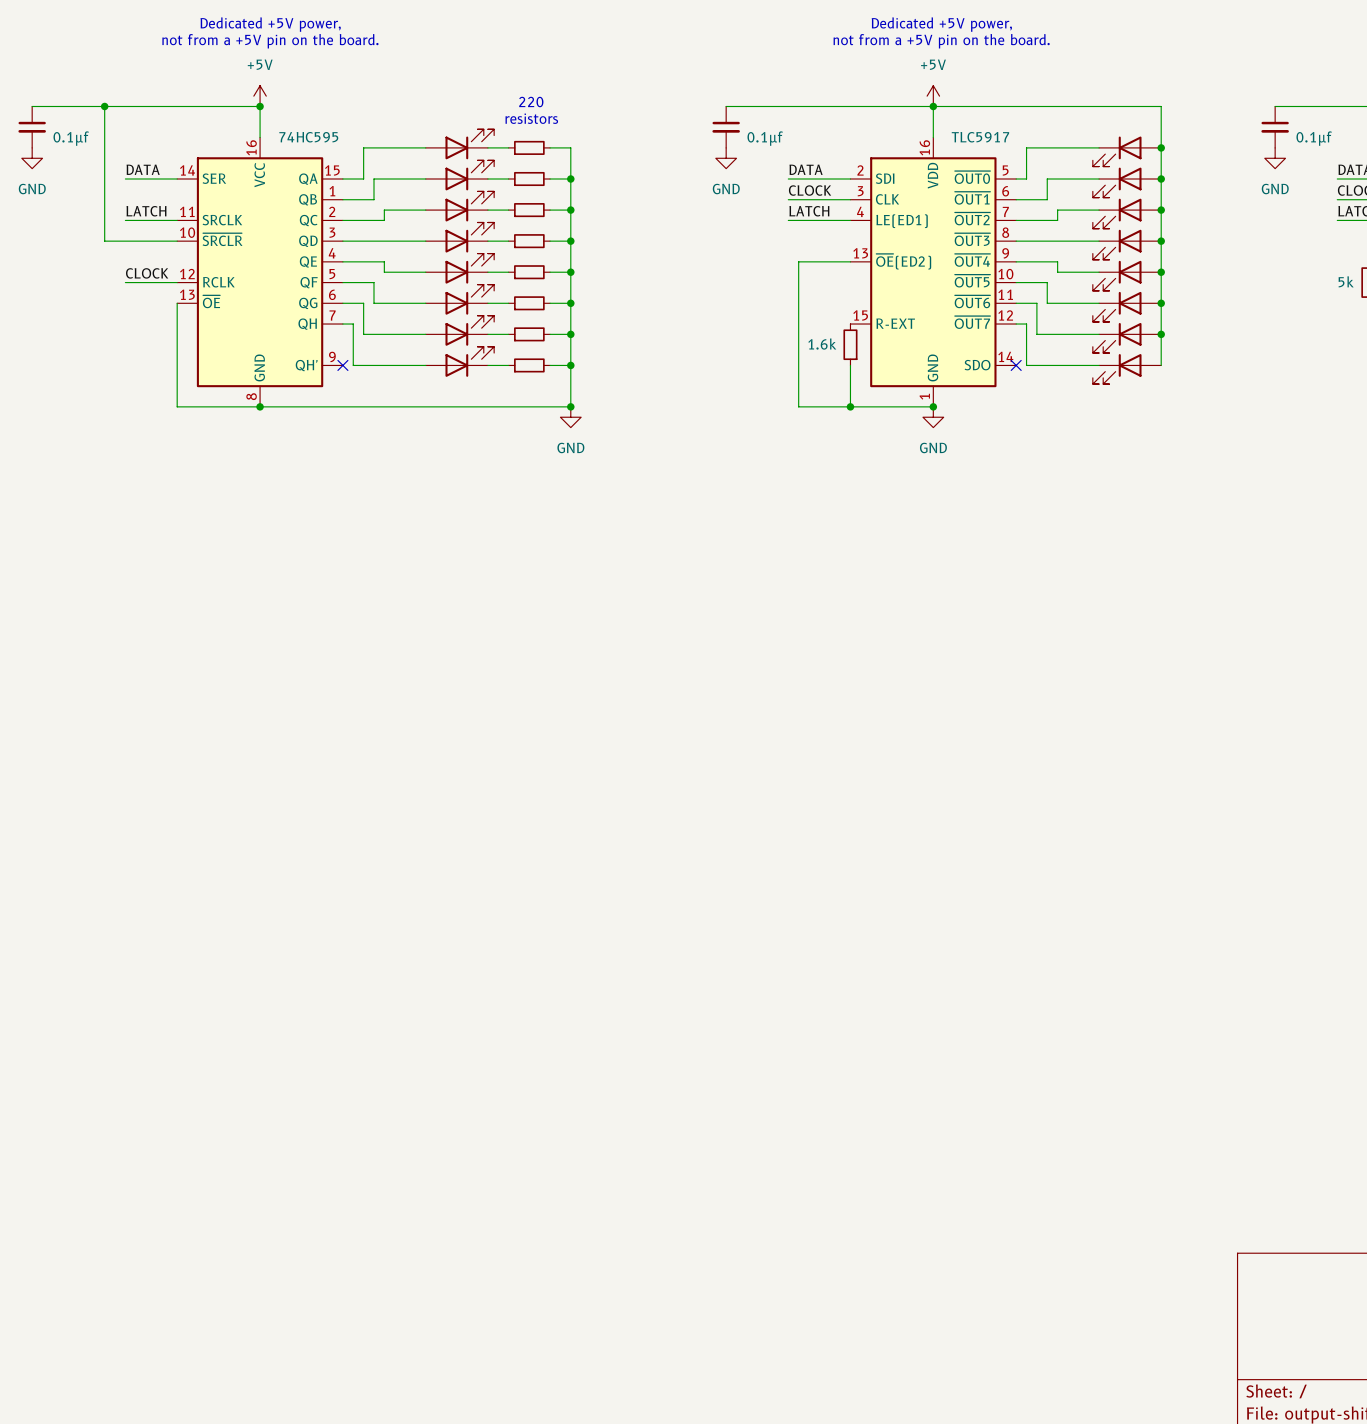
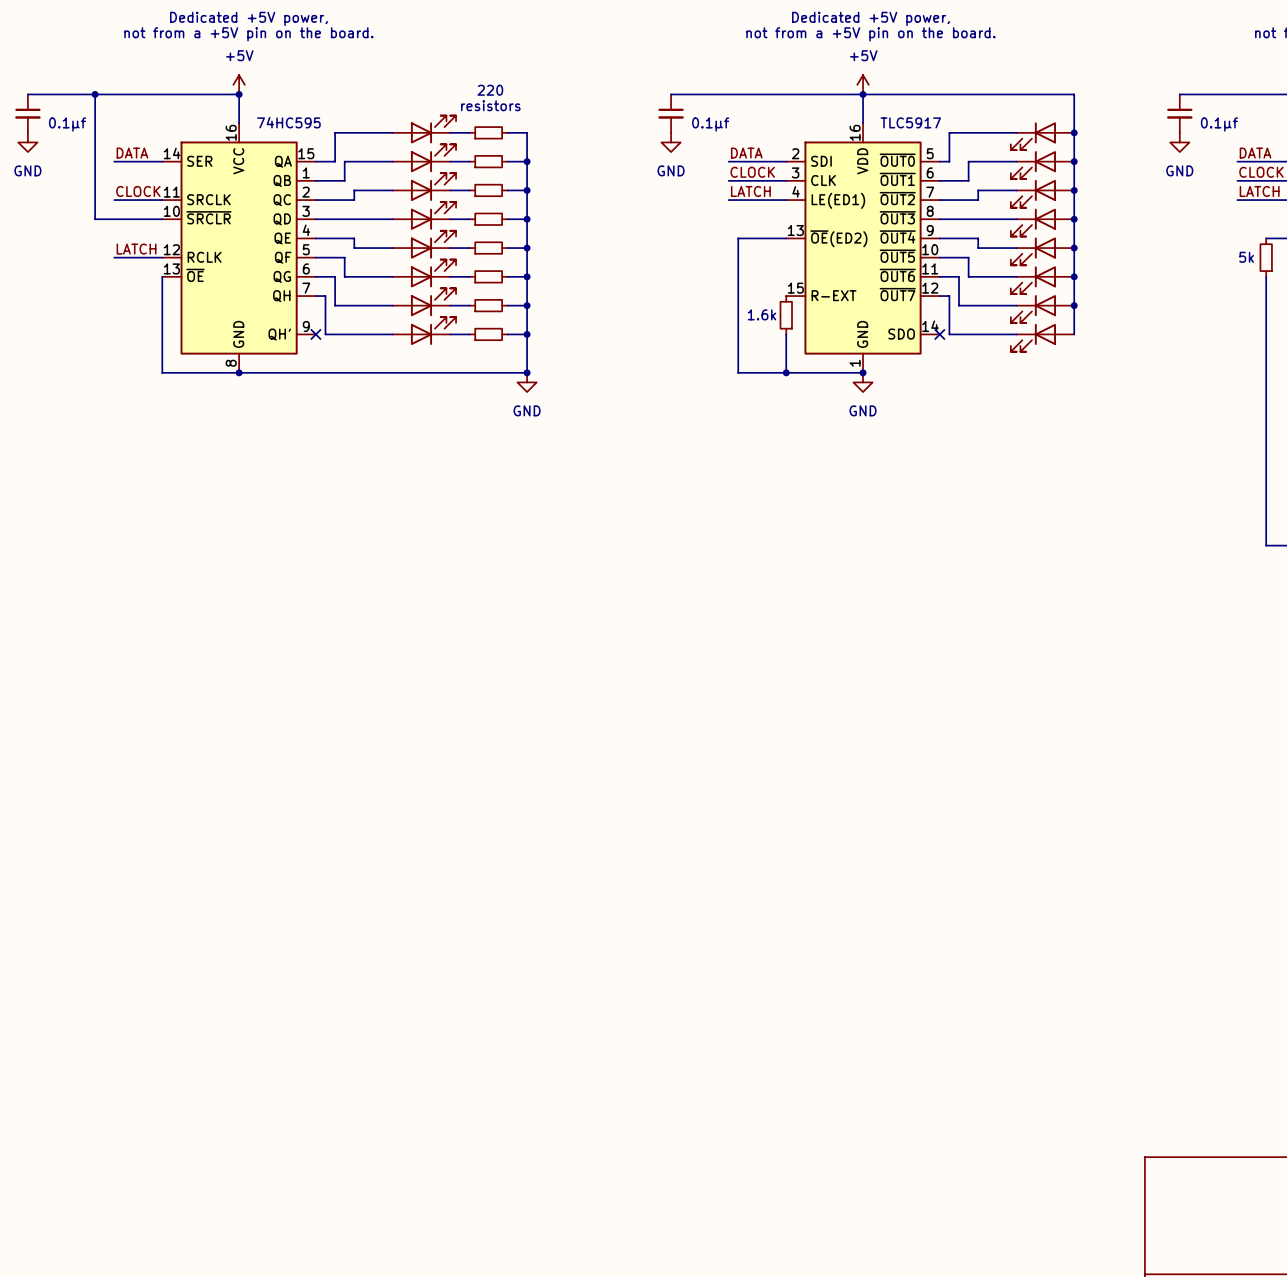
label: LATCH (146, 211) -> CLOCK (138, 191)
label: CLOCK (147, 273) -> LATCH (136, 249)

